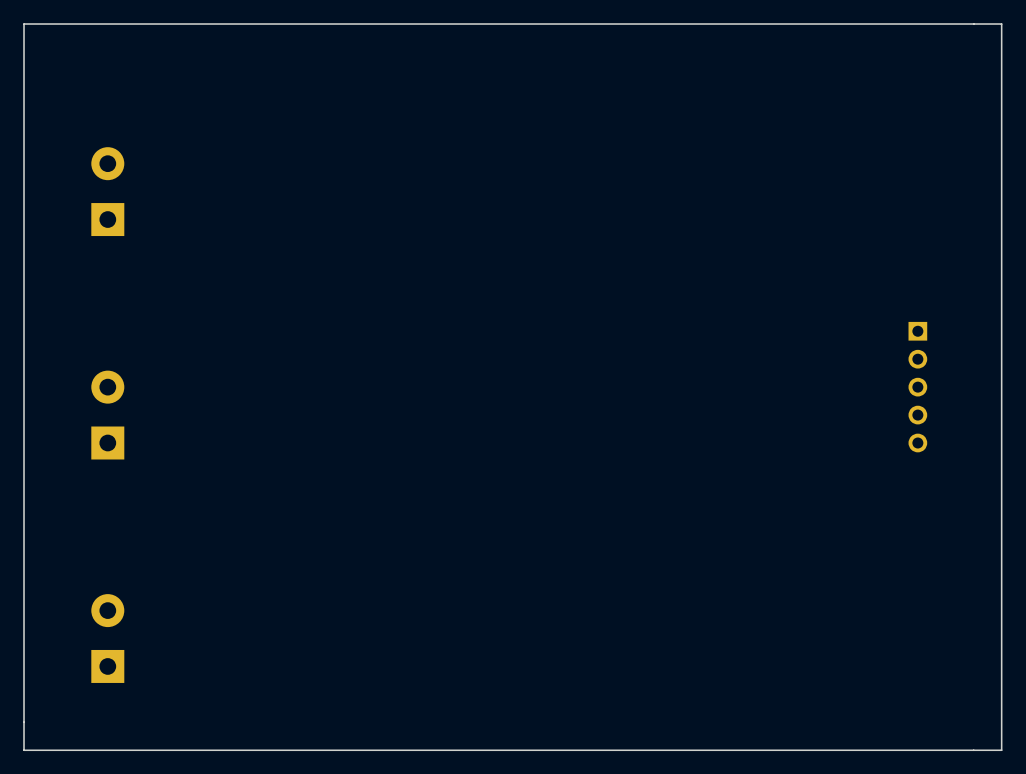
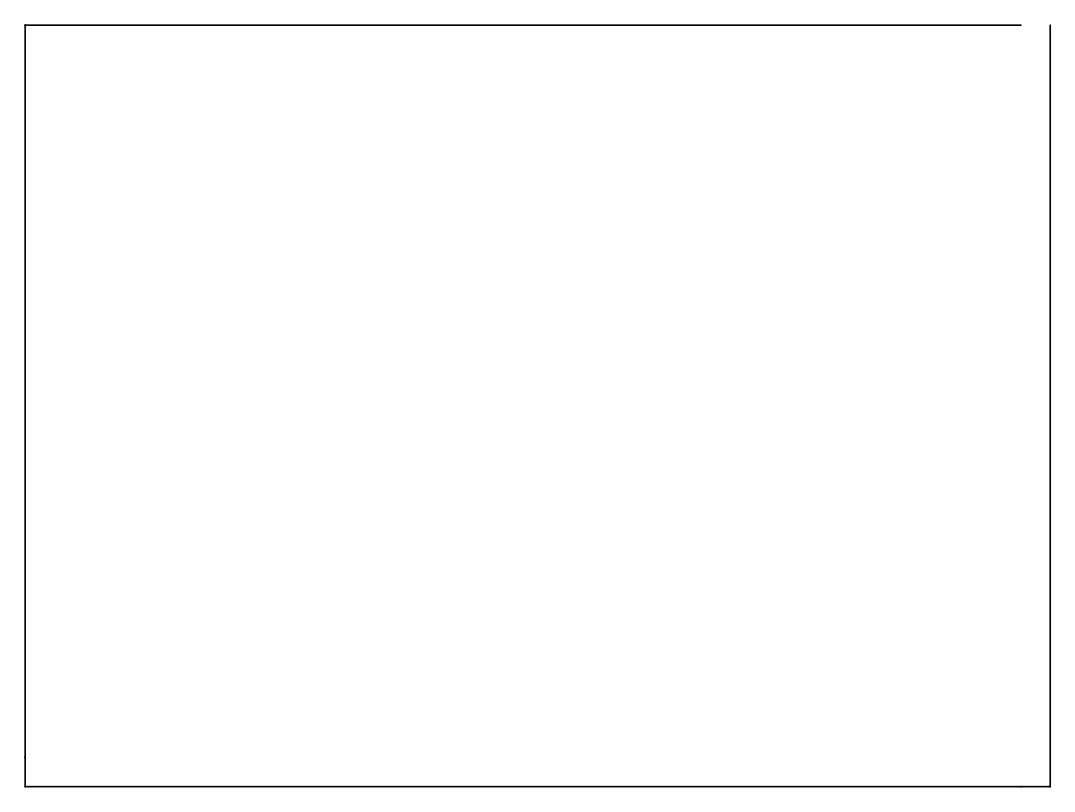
board edge: (1001, 24) (973, 24) -> none
part: (107, 191) -> none
part: (917, 387) -> none
part: (107, 415) -> none
part: (107, 638) -> none

